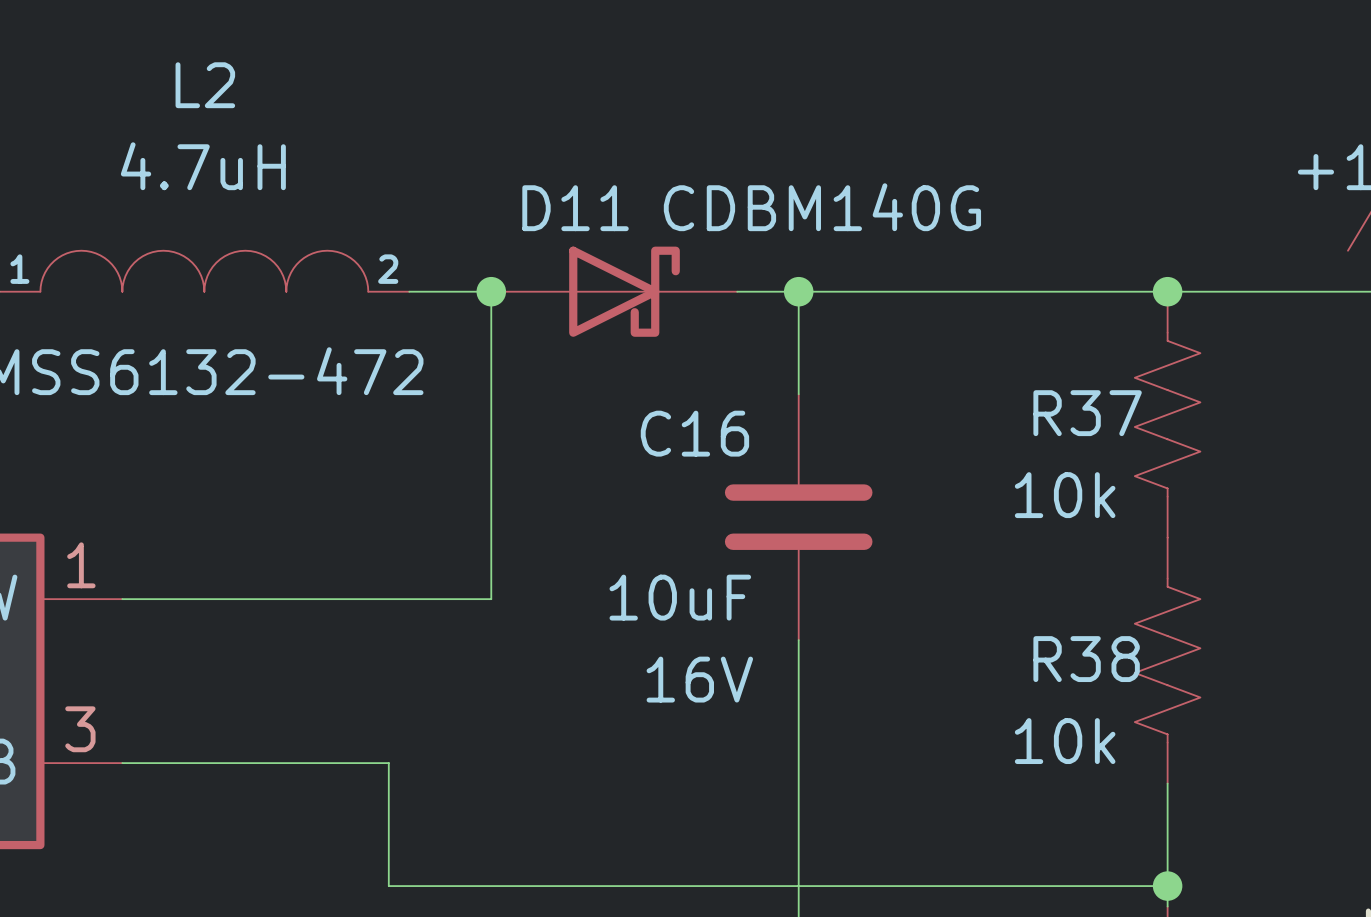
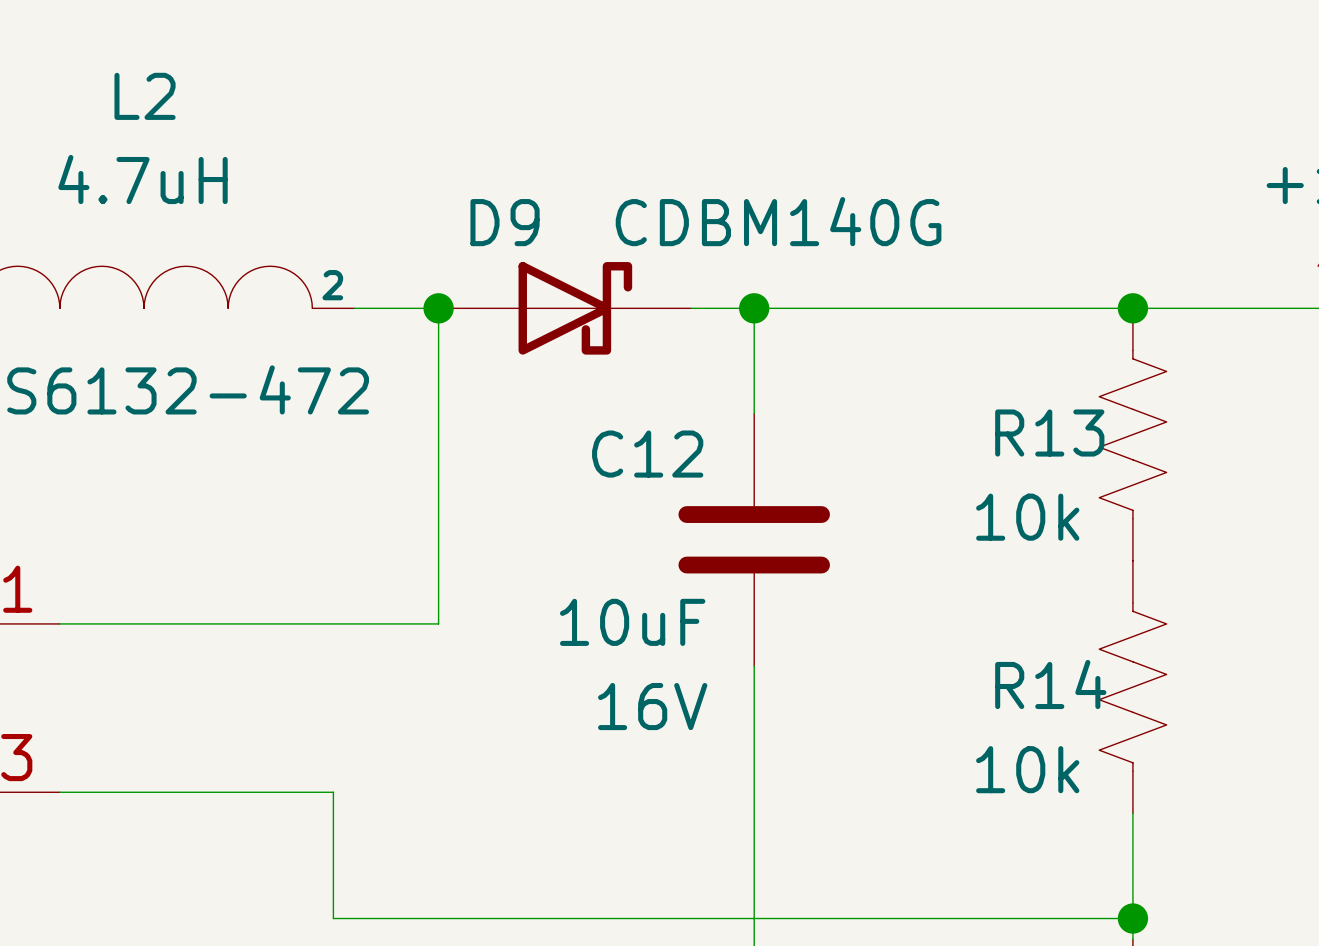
D11 name: D11 (575, 208) -> D9 (505, 222)
R37 name: R37 (1087, 413) -> R13 (1049, 433)
C16 name: C16 (694, 433) -> C12 (647, 454)
R38 name: R38 (1086, 659) -> R14 (1050, 684)

